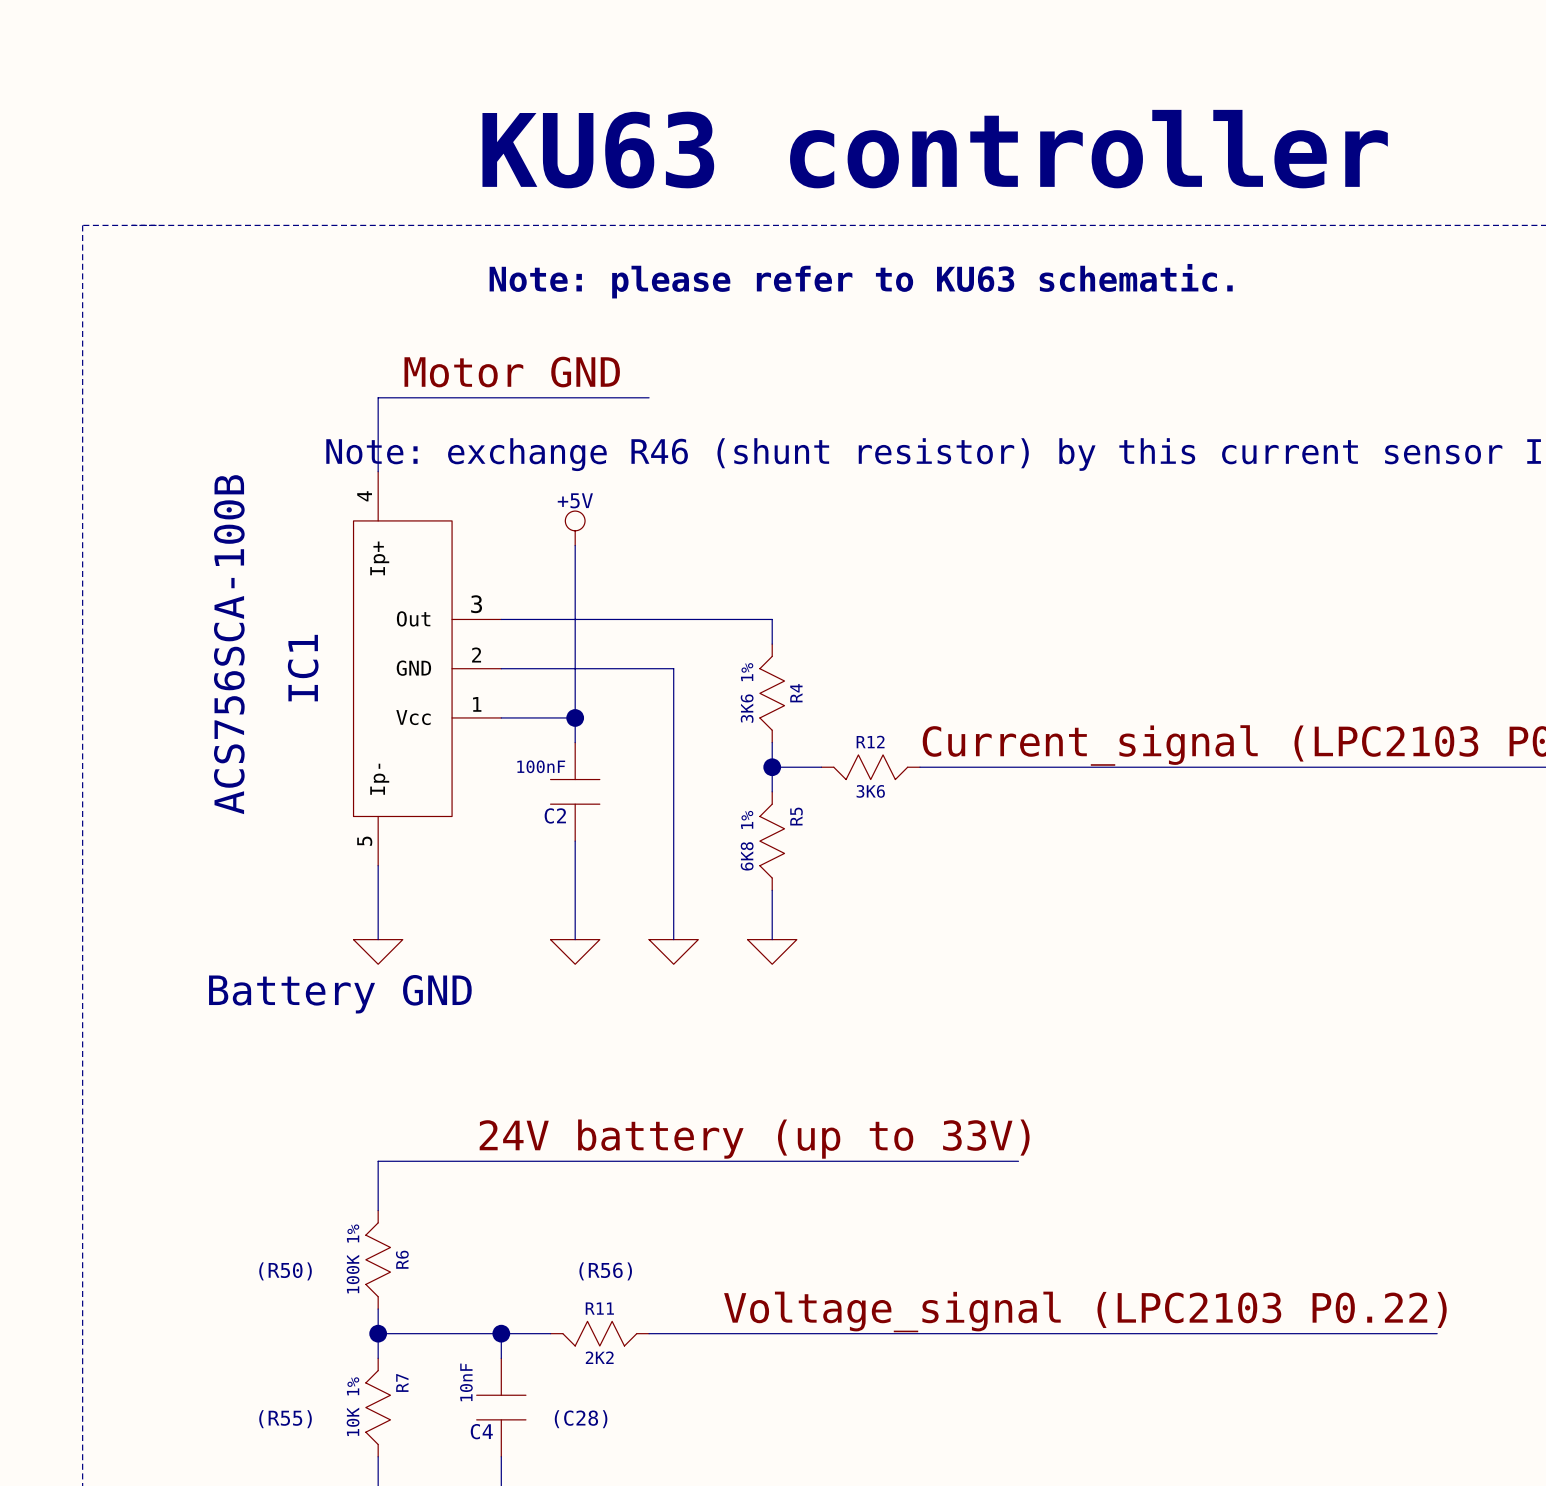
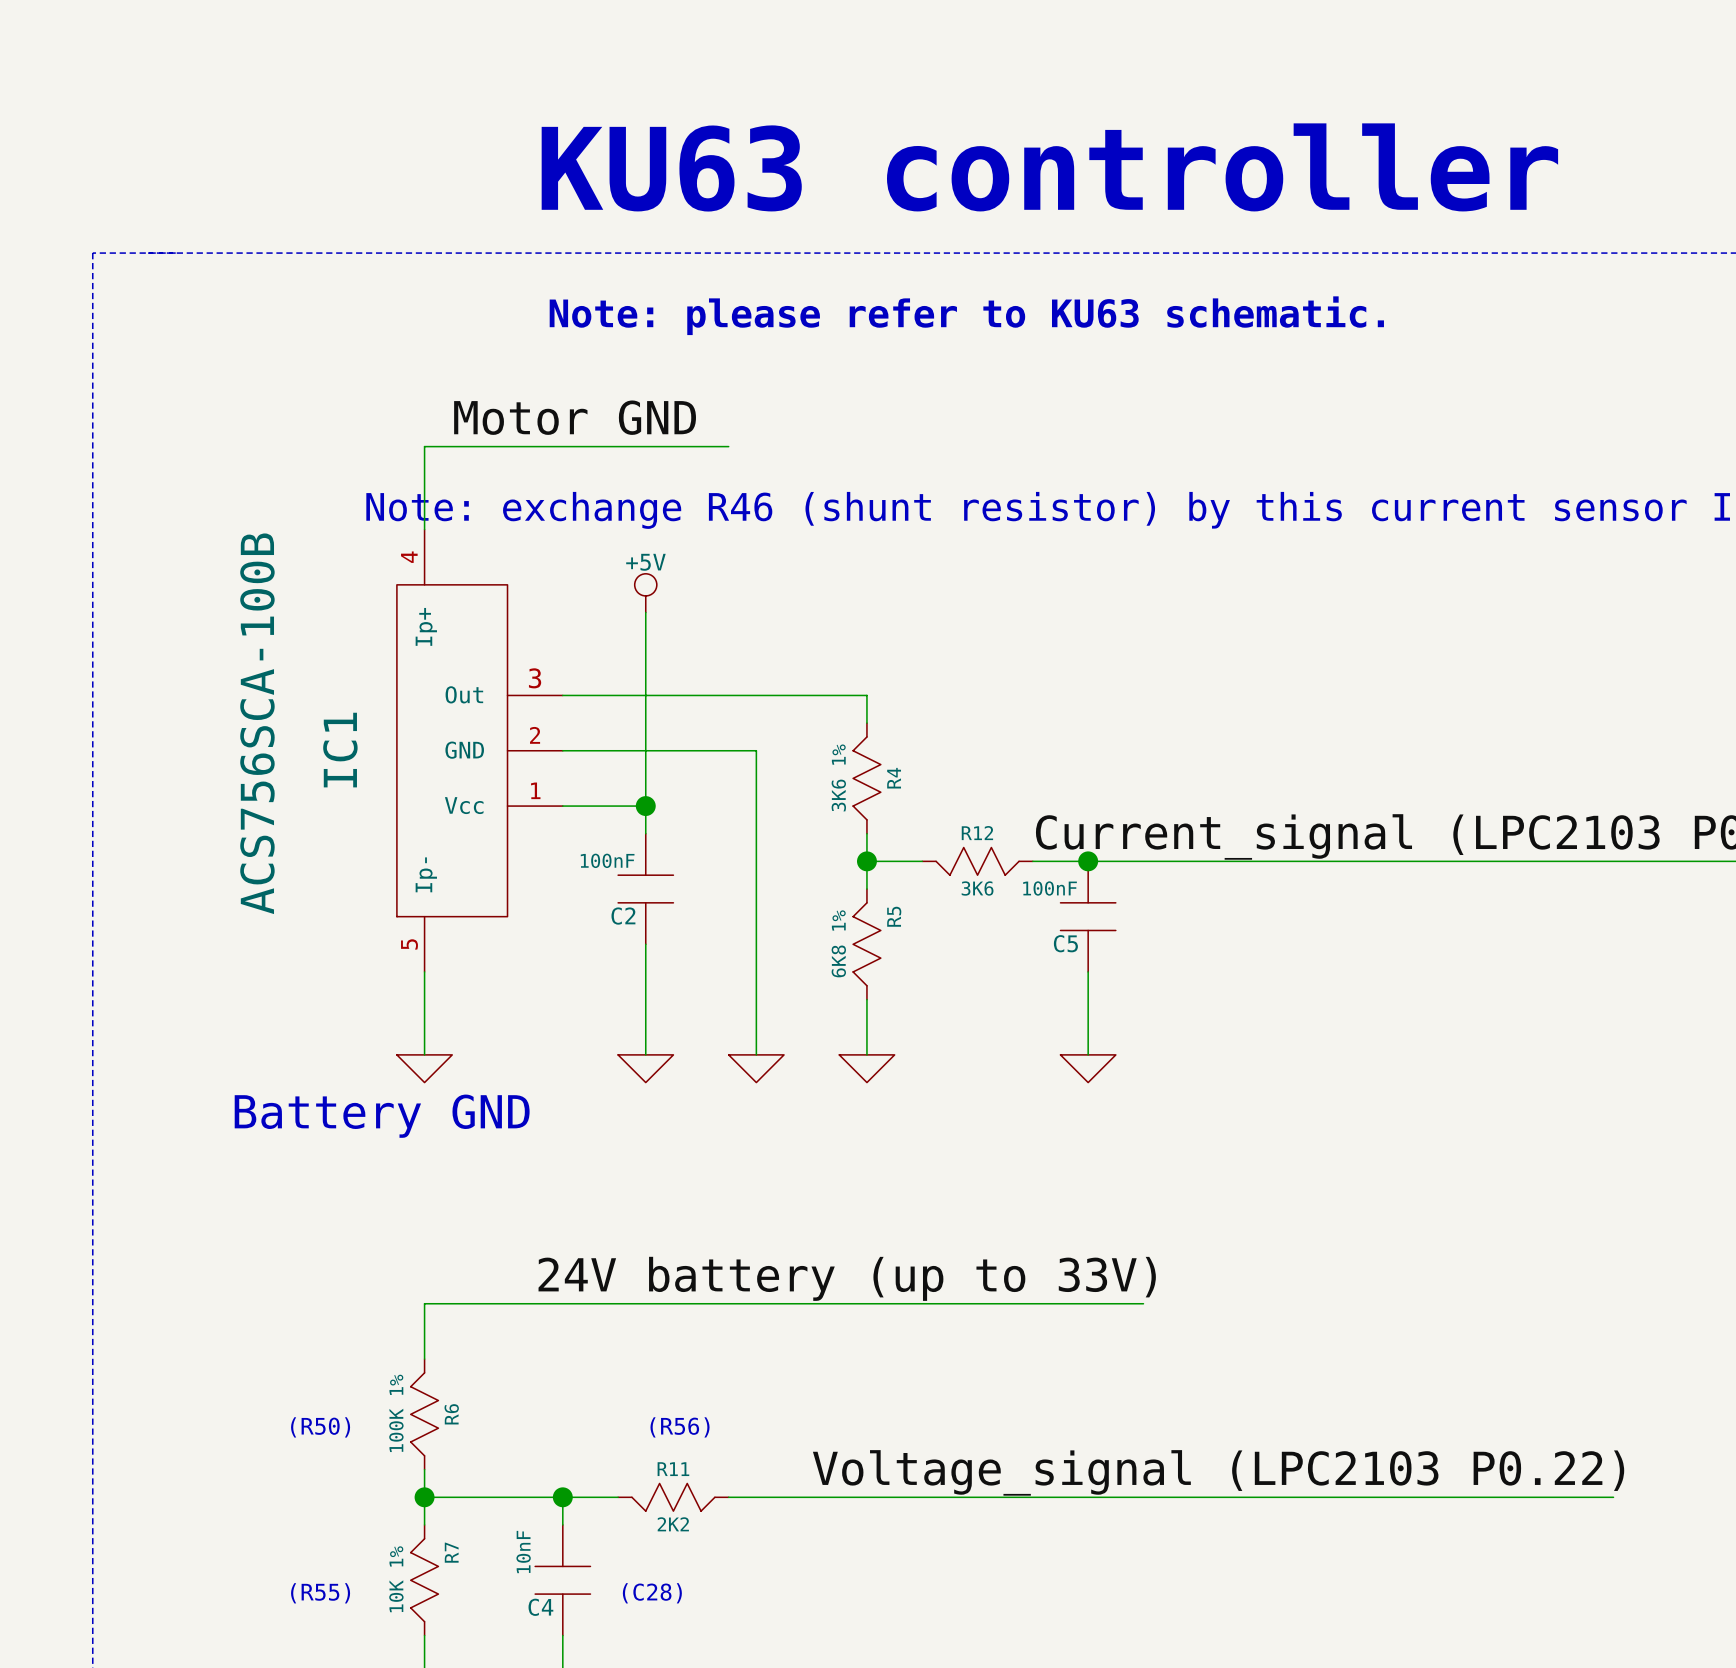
junction: none -> (1088, 861)
C5: none -> 100nF (1088, 916)
wire: none -> (1088, 971) (1088, 1054)
power symbol: none -> (1088, 1068)

